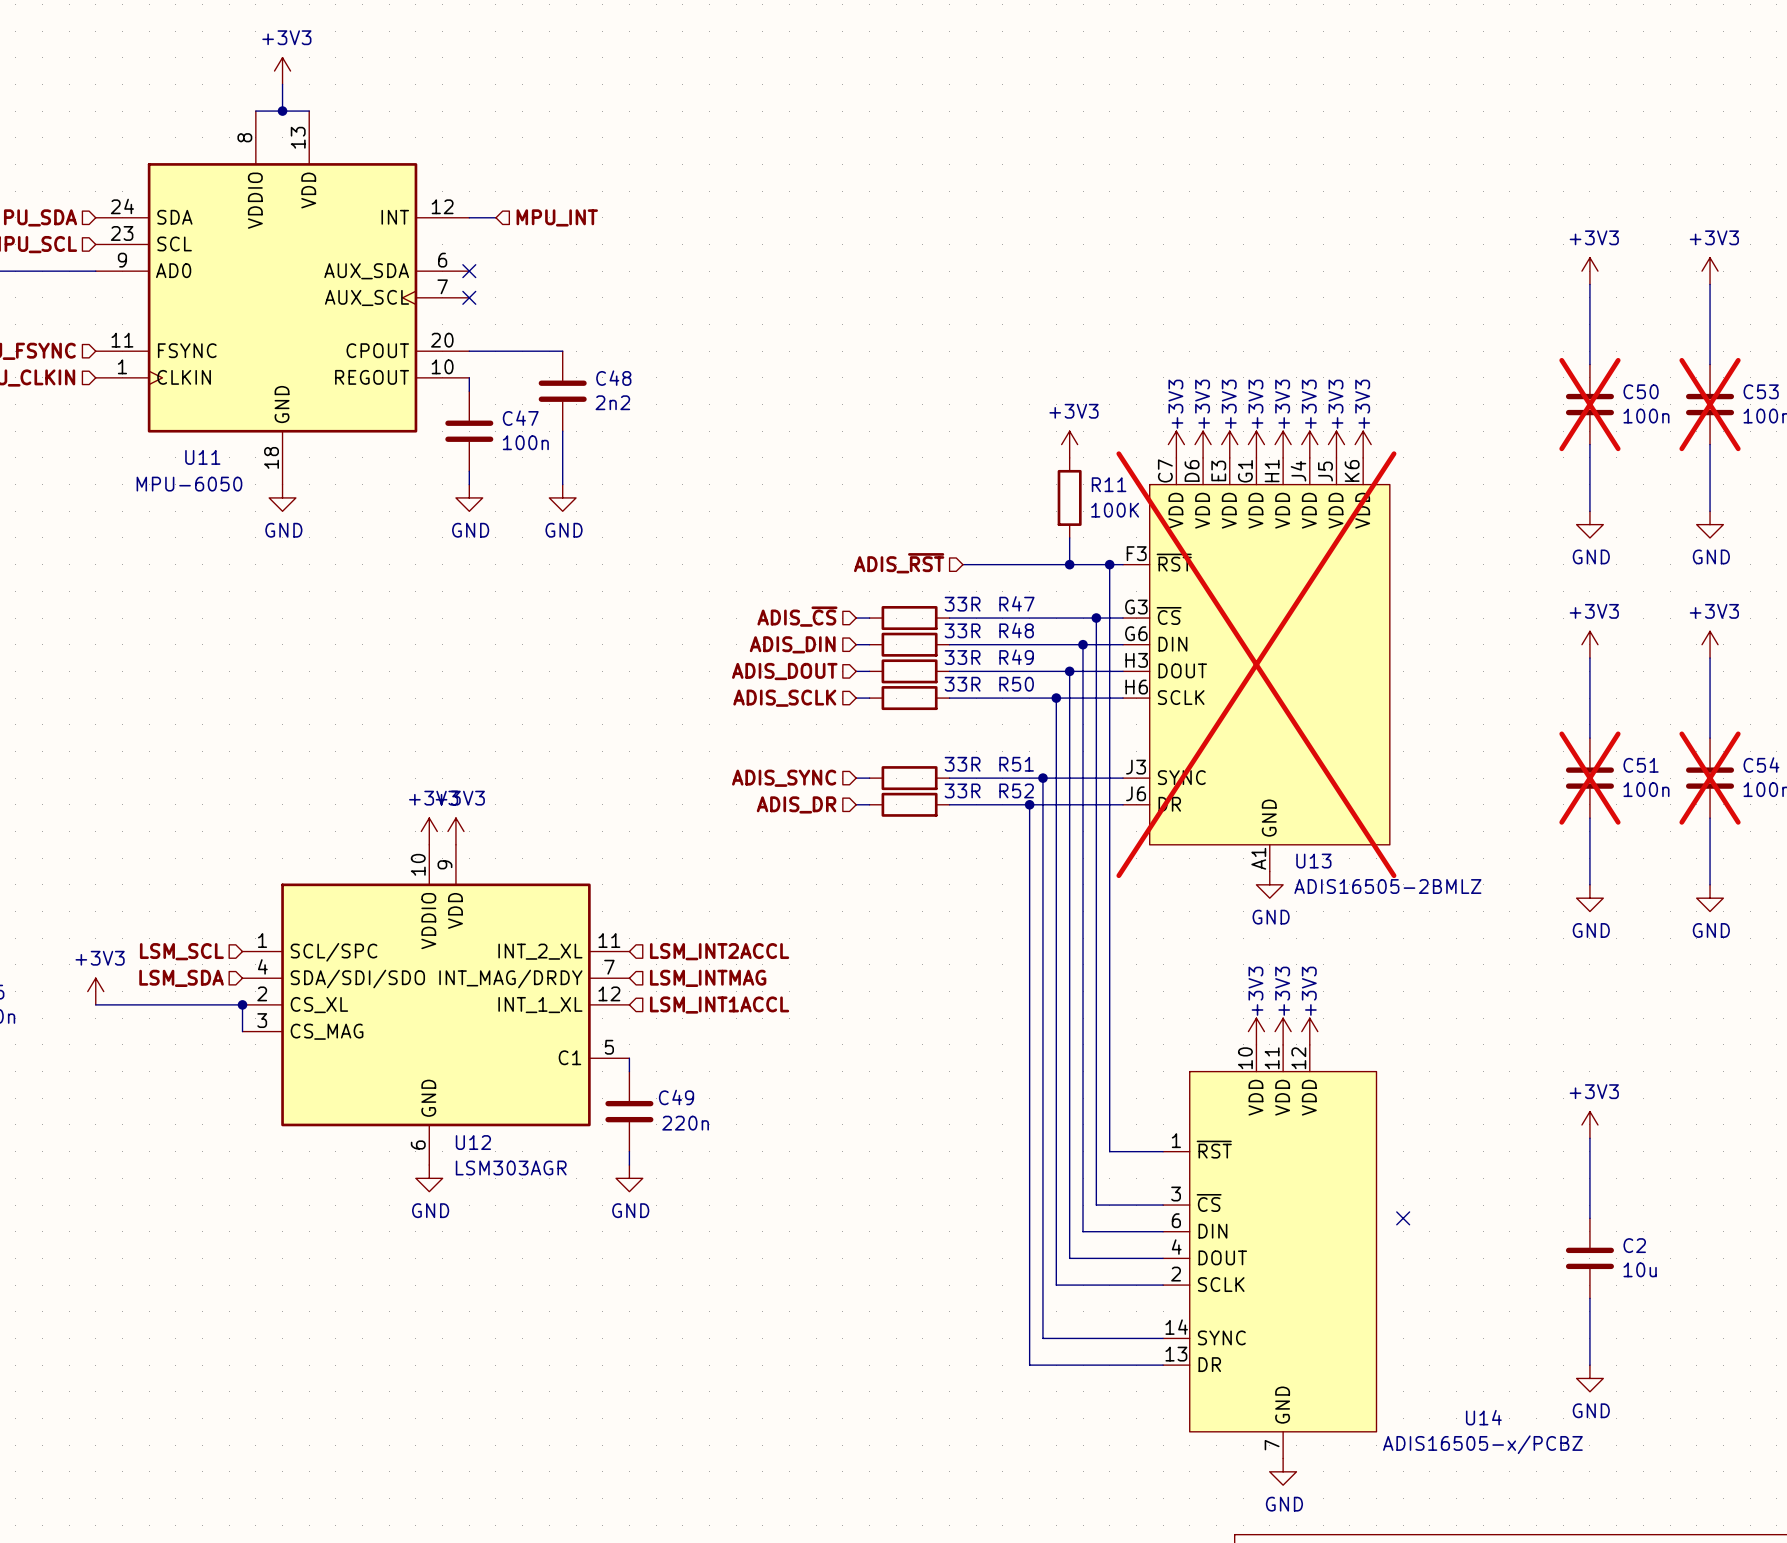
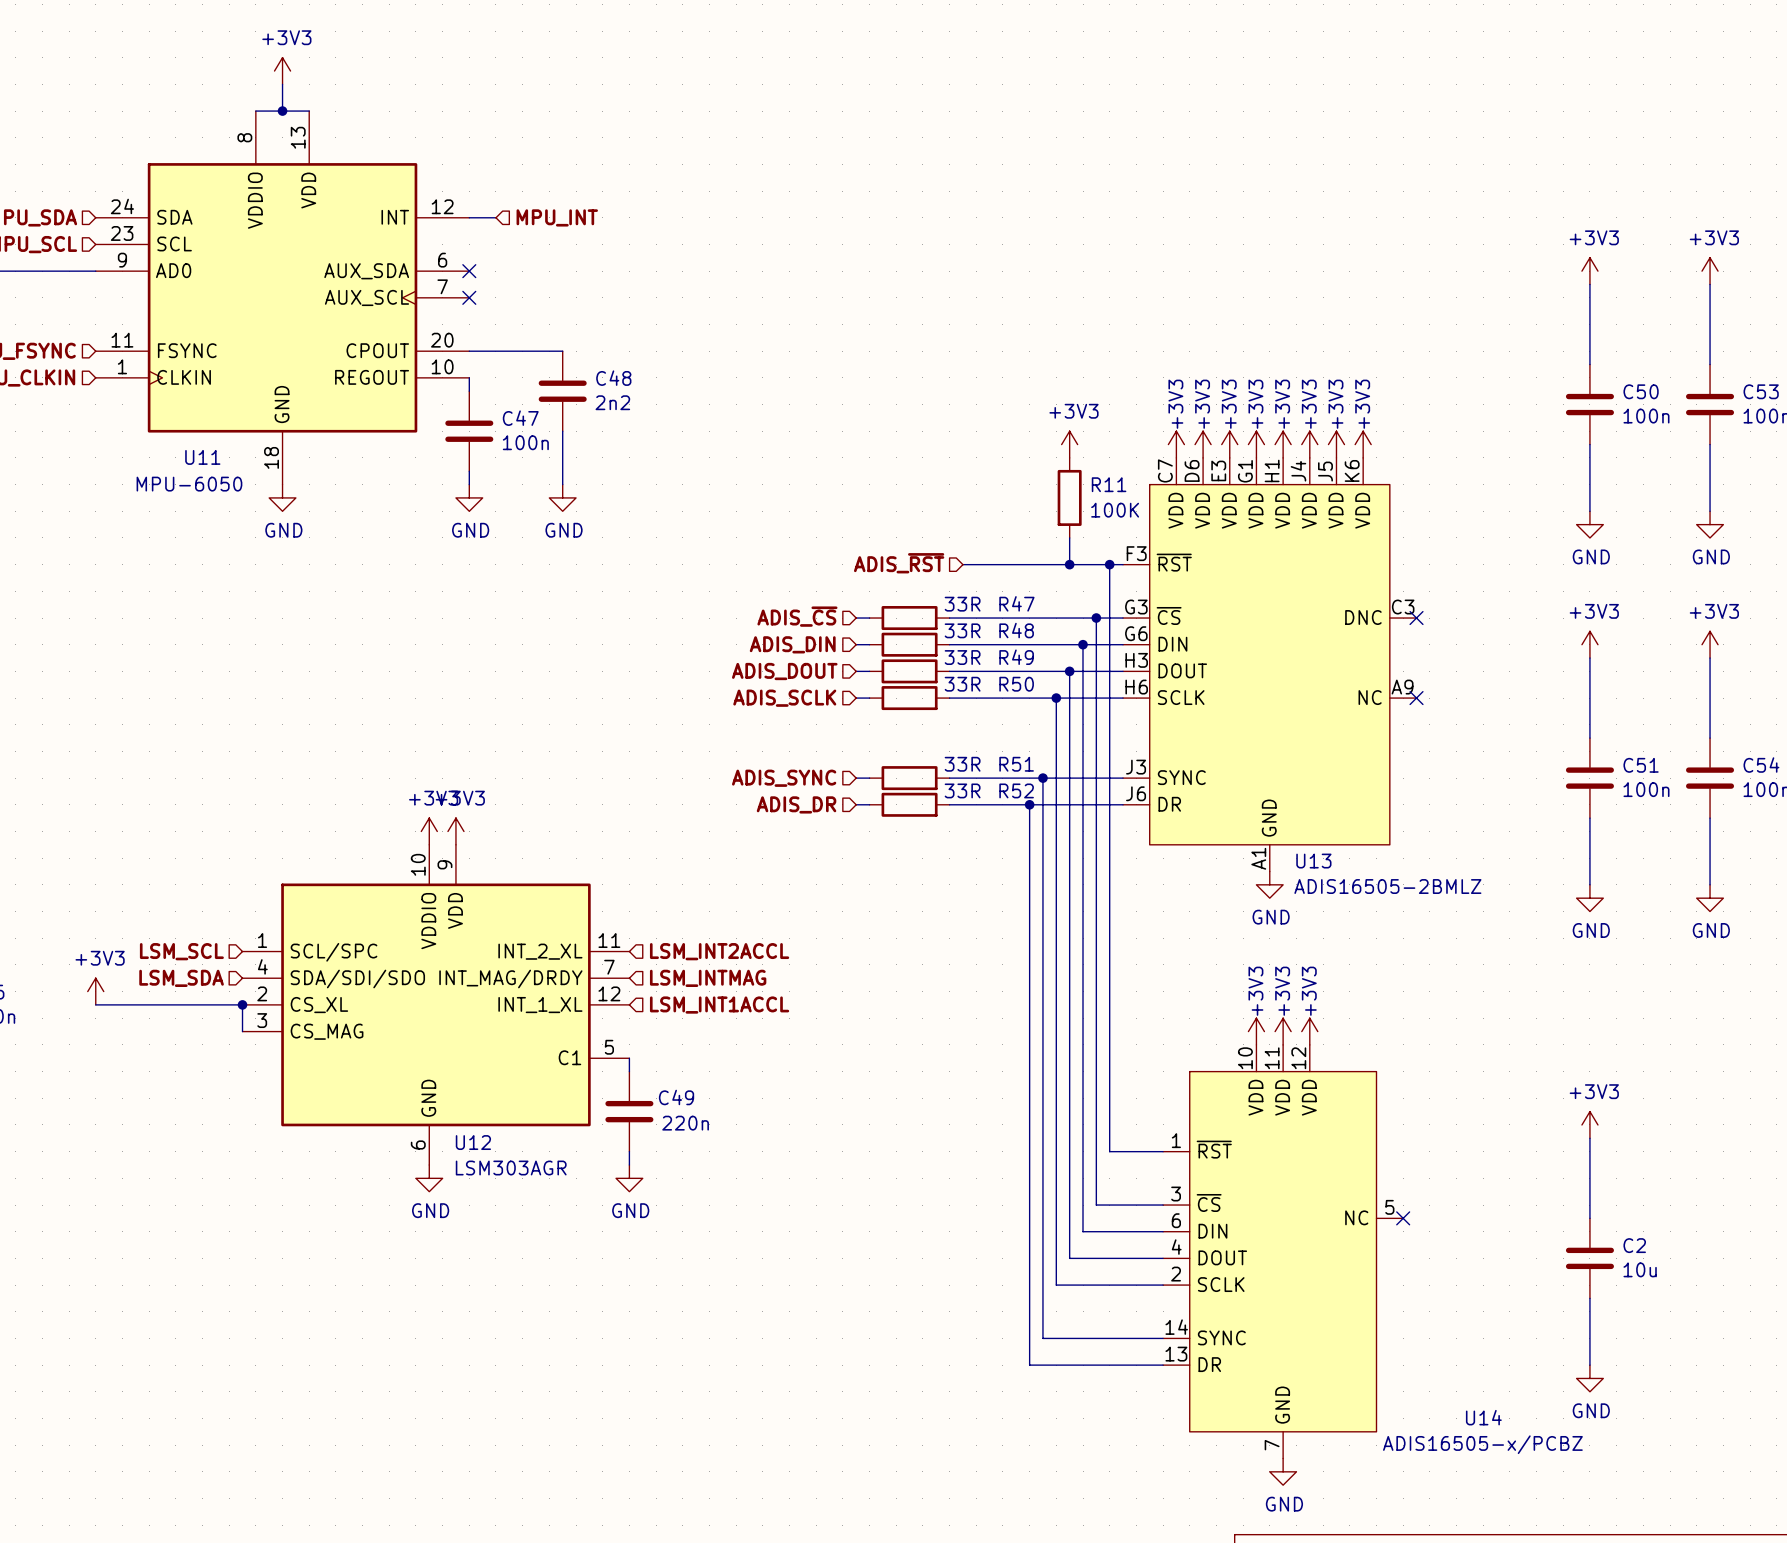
C50 do-not-place cross: (1589, 404) -> none
C53 do-not-place cross: (1710, 404) -> none
U13 symbol: [1123, 457, 1390, 872] -> [1123, 457, 1417, 872]
no-connect mark: none -> (1416, 618)
U13 do-not-place cross: (1256, 664) -> none
no-connect mark: none -> (1416, 698)
C51 do-not-place cross: (1589, 778) -> none
C54 do-not-place cross: (1710, 778) -> none
U14 symbol: [1163, 1044, 1377, 1459] -> [1163, 1044, 1404, 1459]

